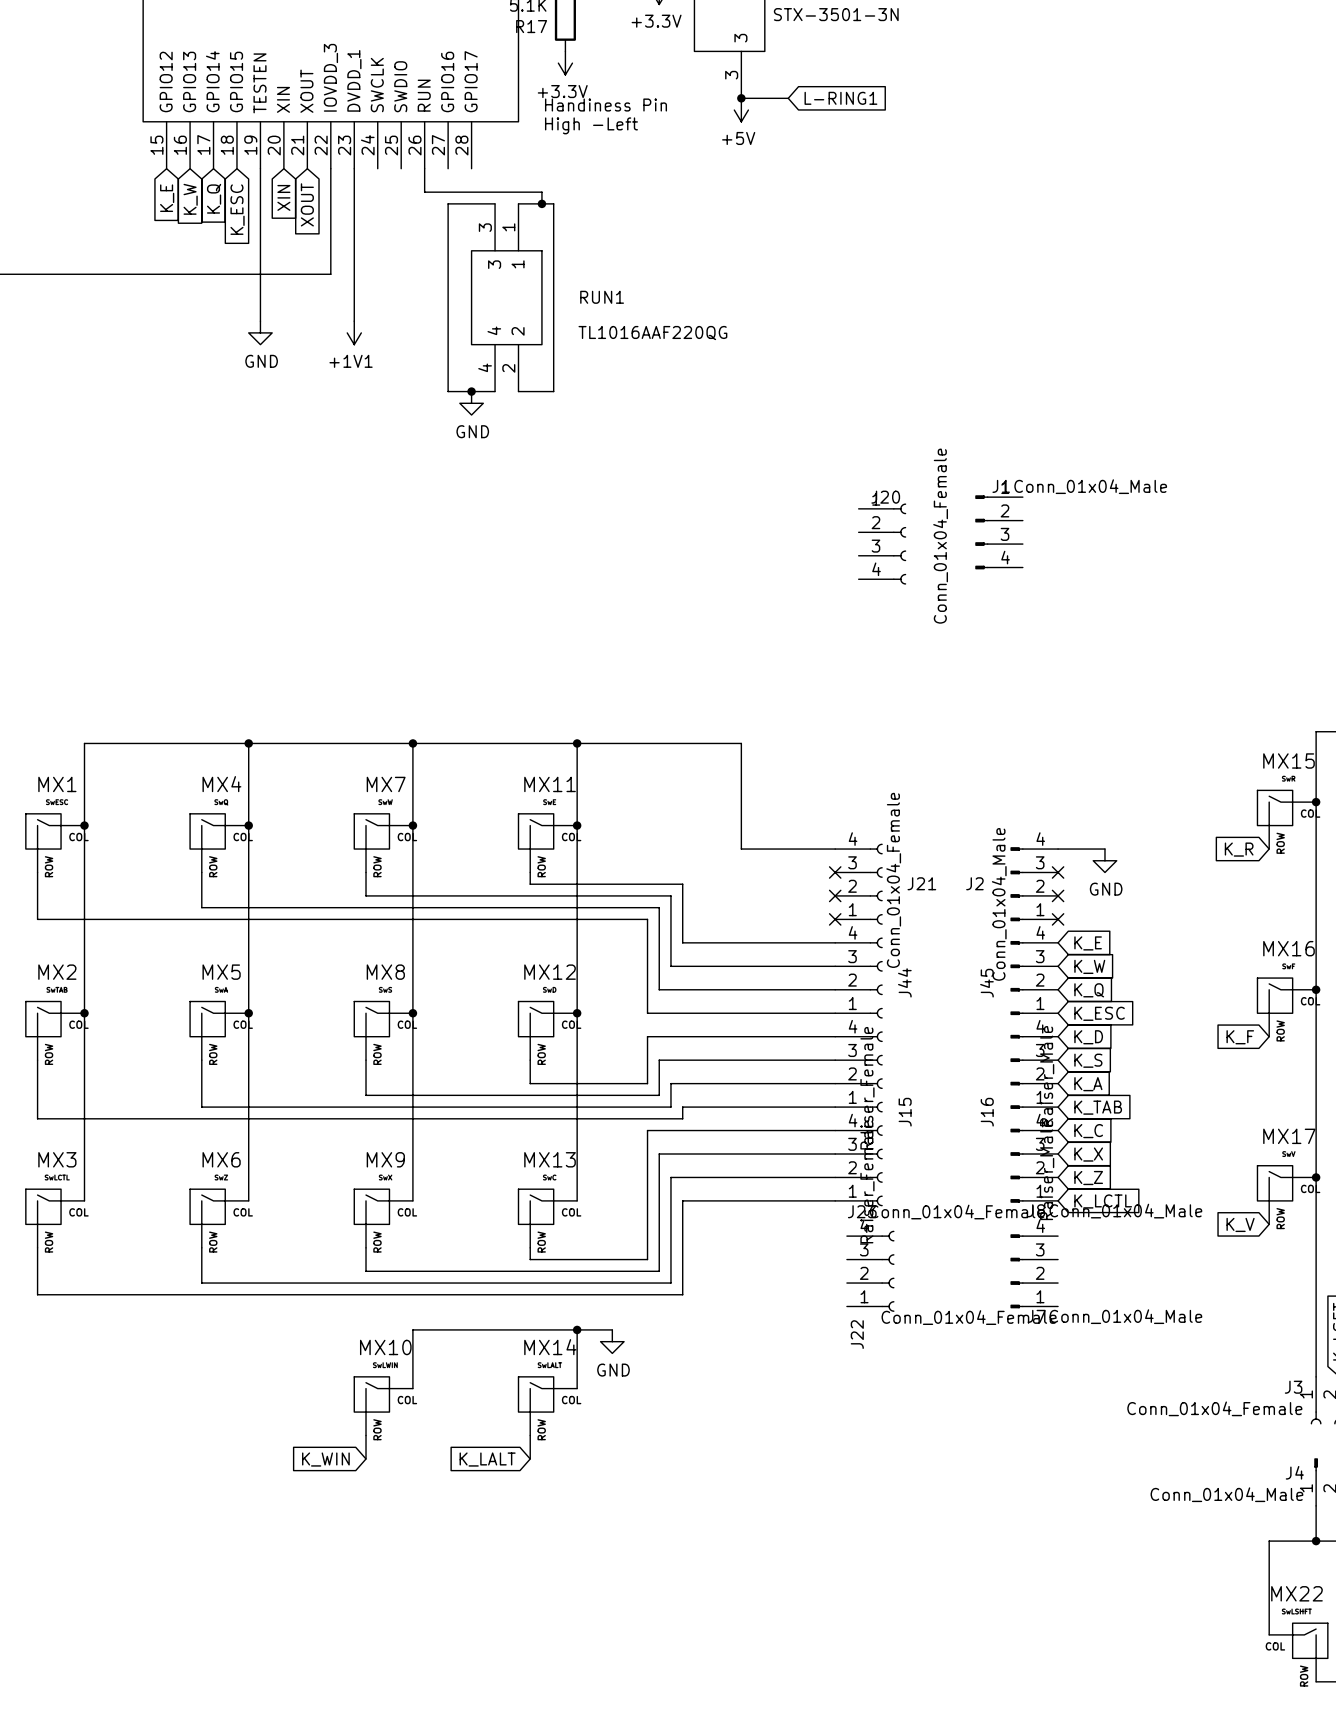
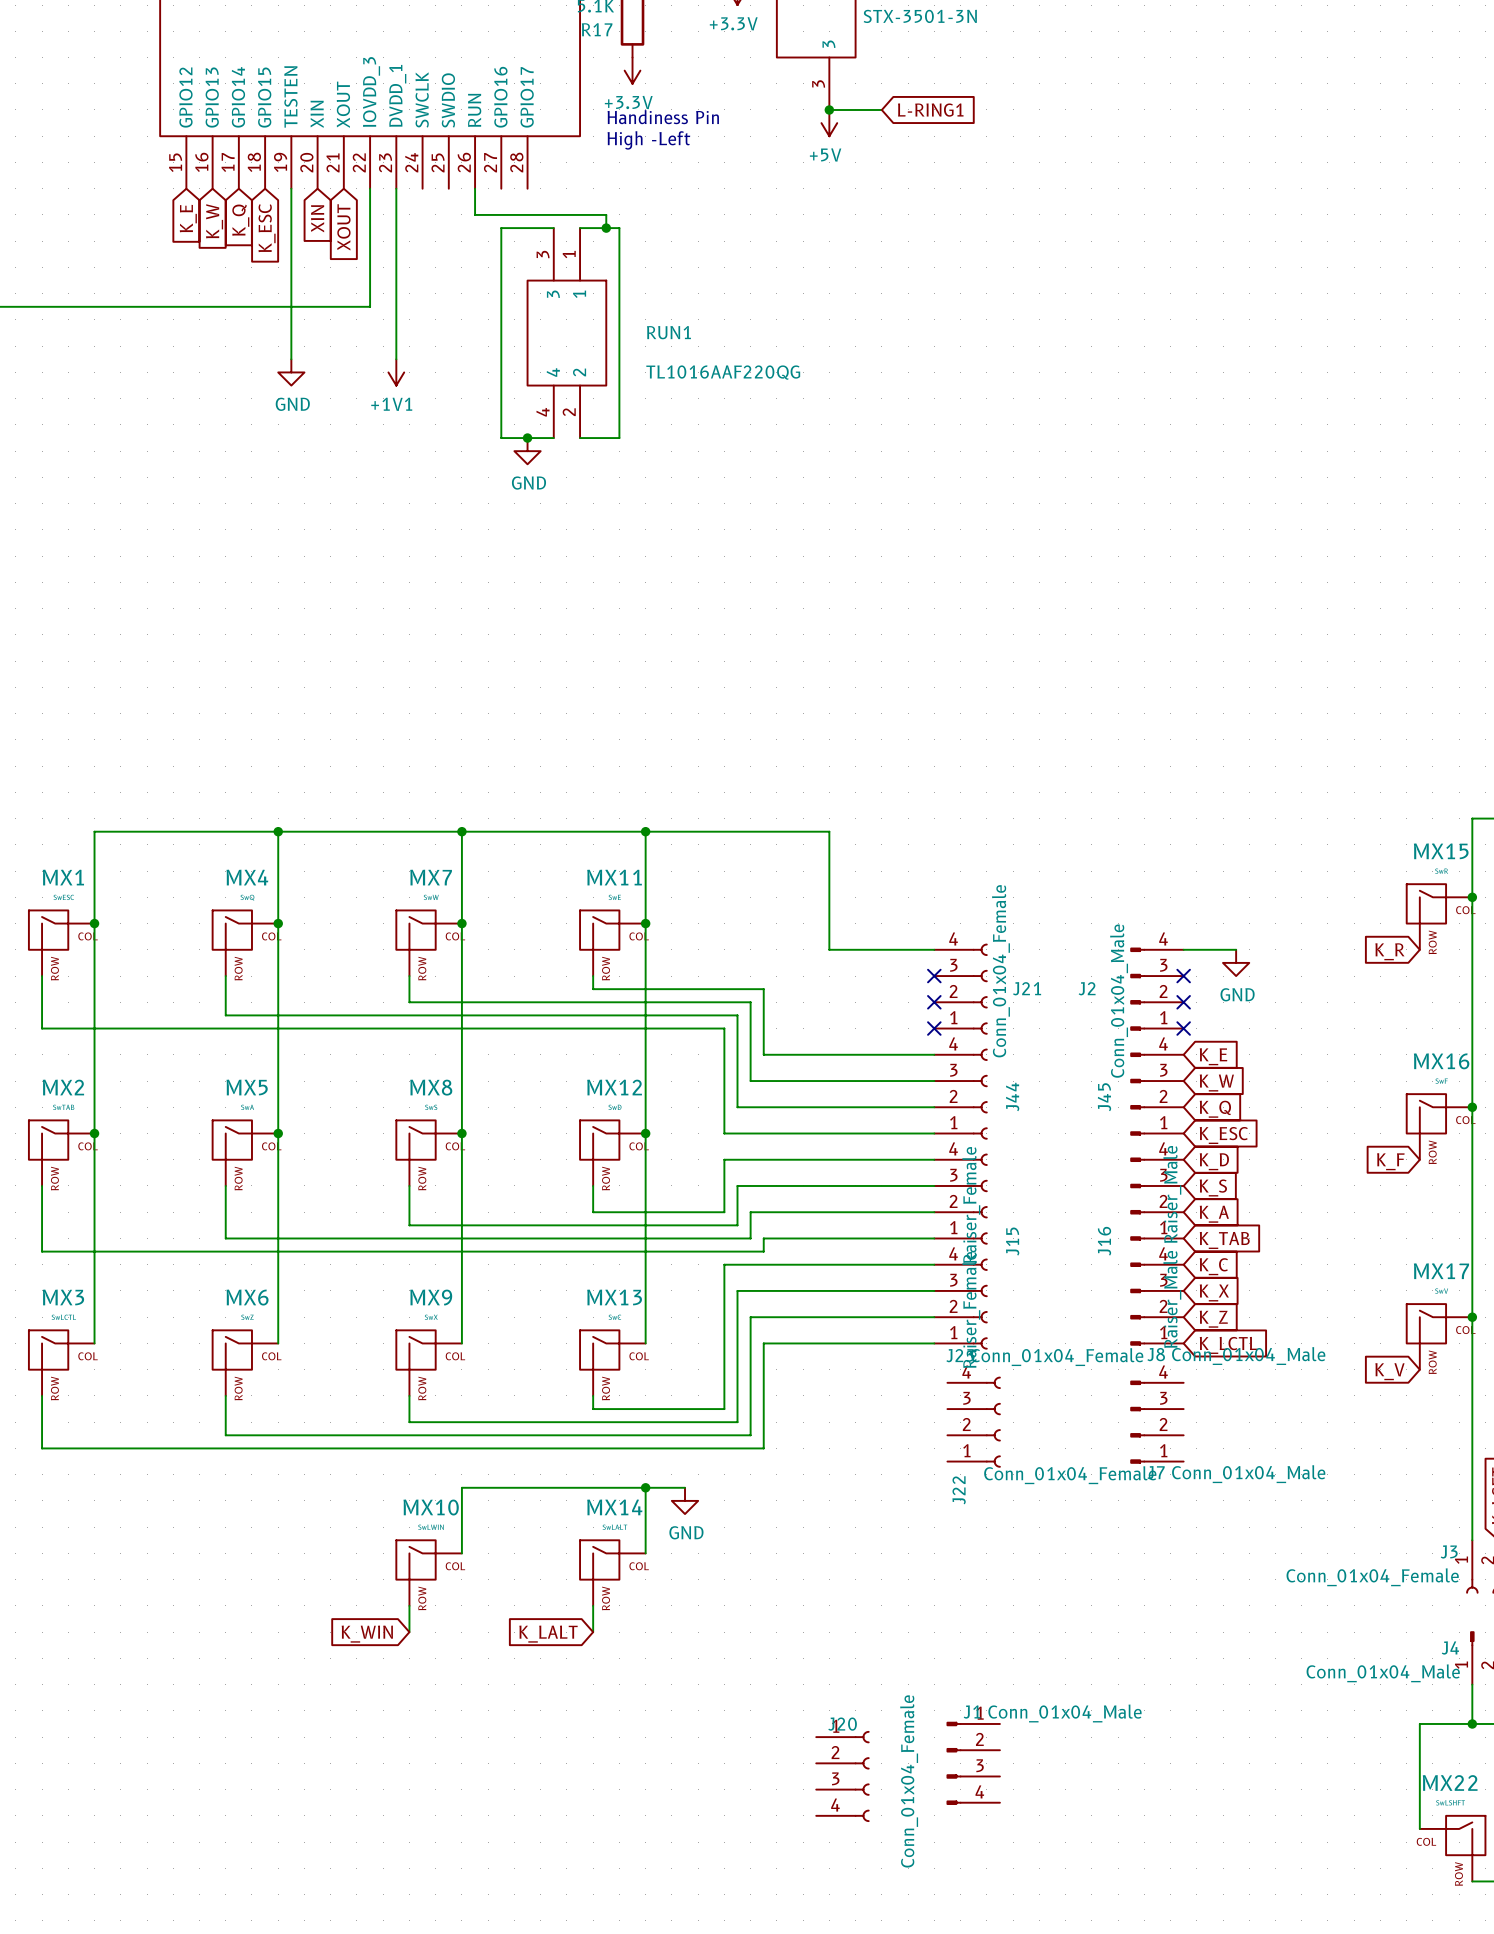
J1 position: (999, 532) -> (973, 1763)
J20 position: (882, 544) -> (842, 1776)

